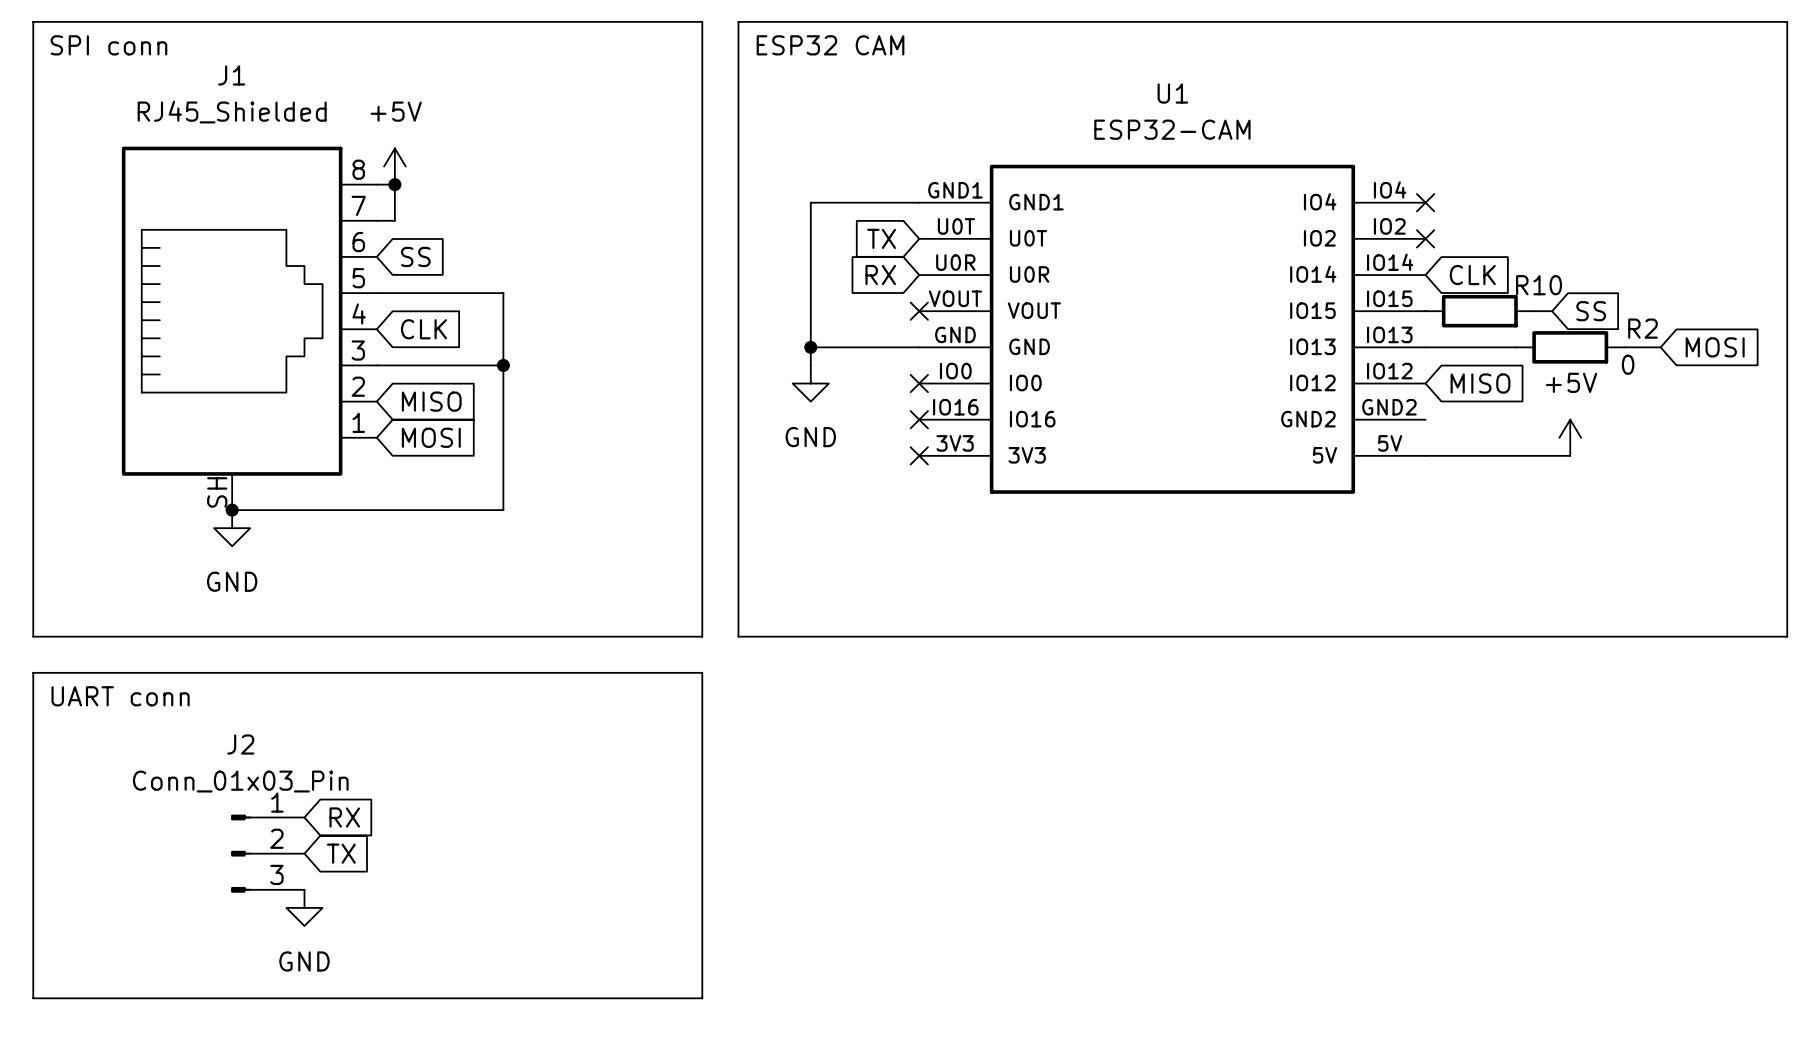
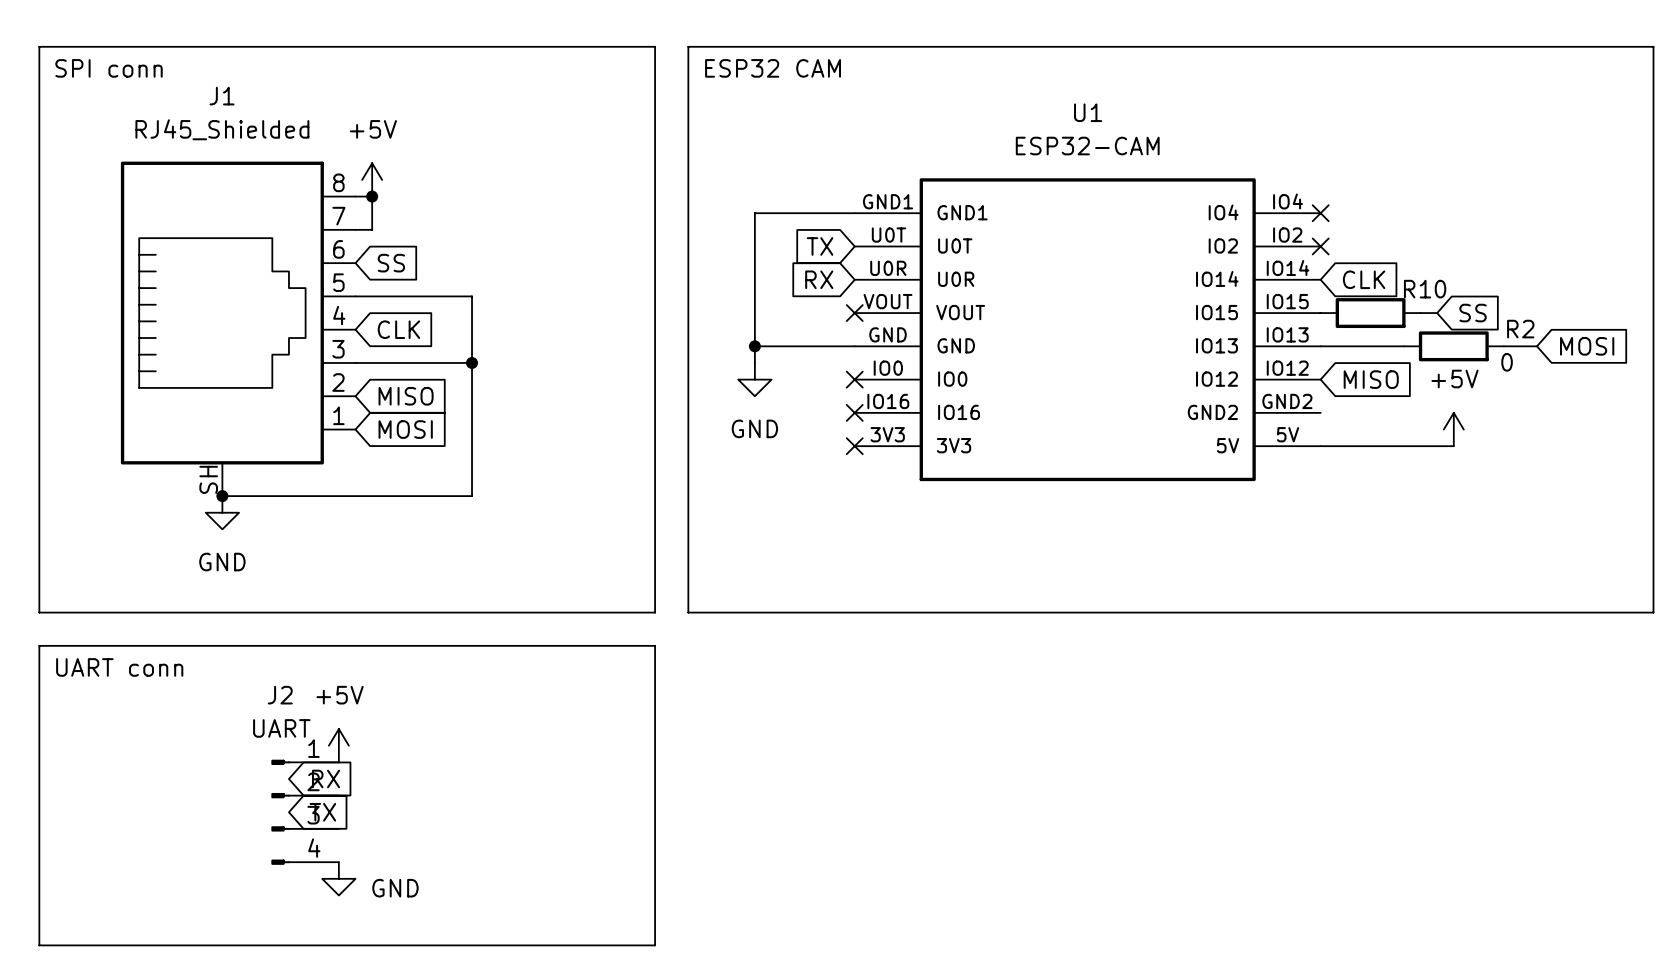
J2 value: Conn_01x03_Pin (240, 781) -> UART (281, 728)
power symbol: none -> +5V (338, 745)
J2 symbol: [231, 814, 305, 893] -> [271, 759, 339, 865]
power symbol position: GND (304, 907) -> GND (338, 878)
power symbol text position: GND (304, 961) -> GND (395, 888)

